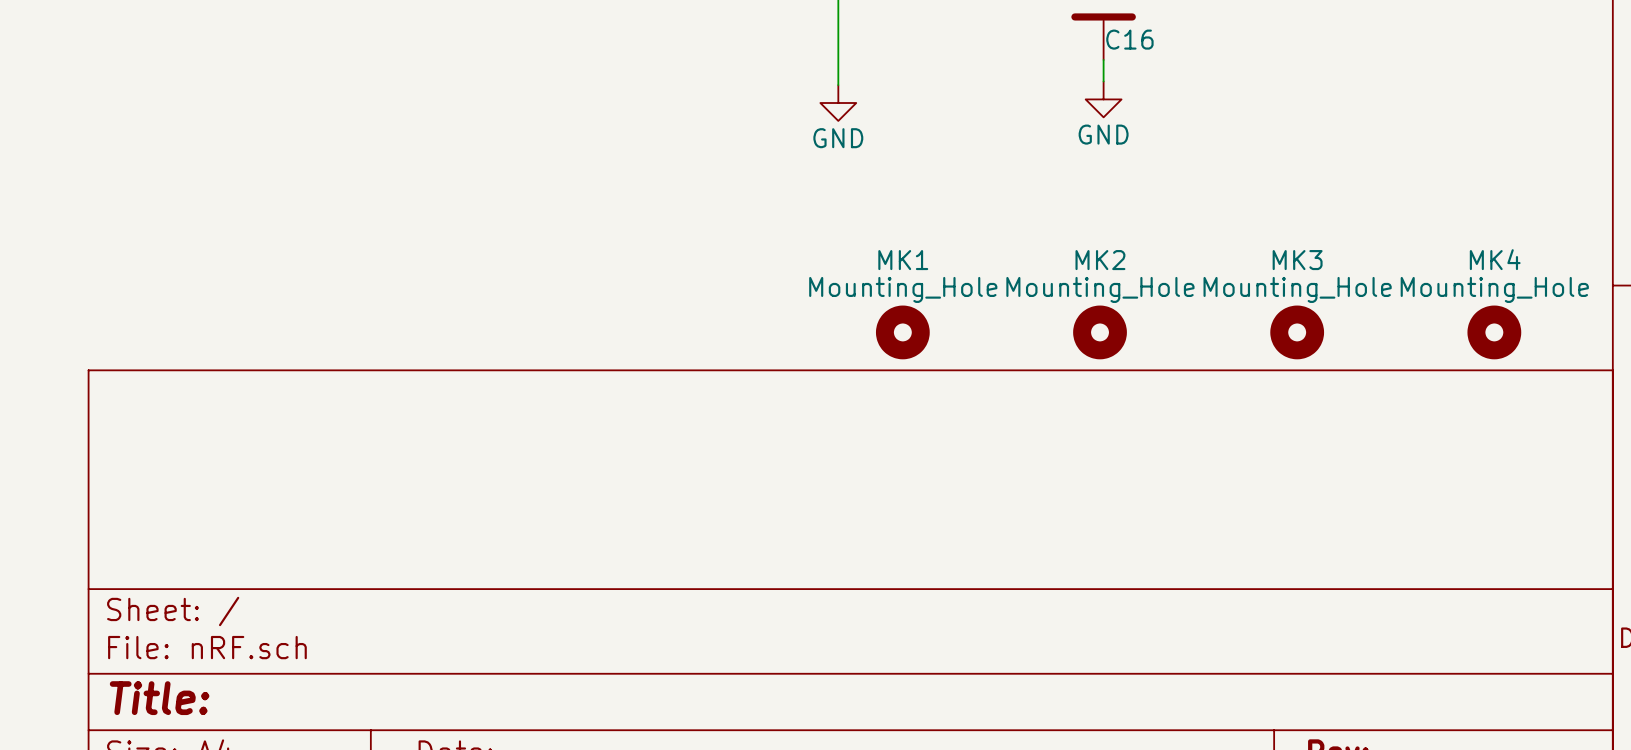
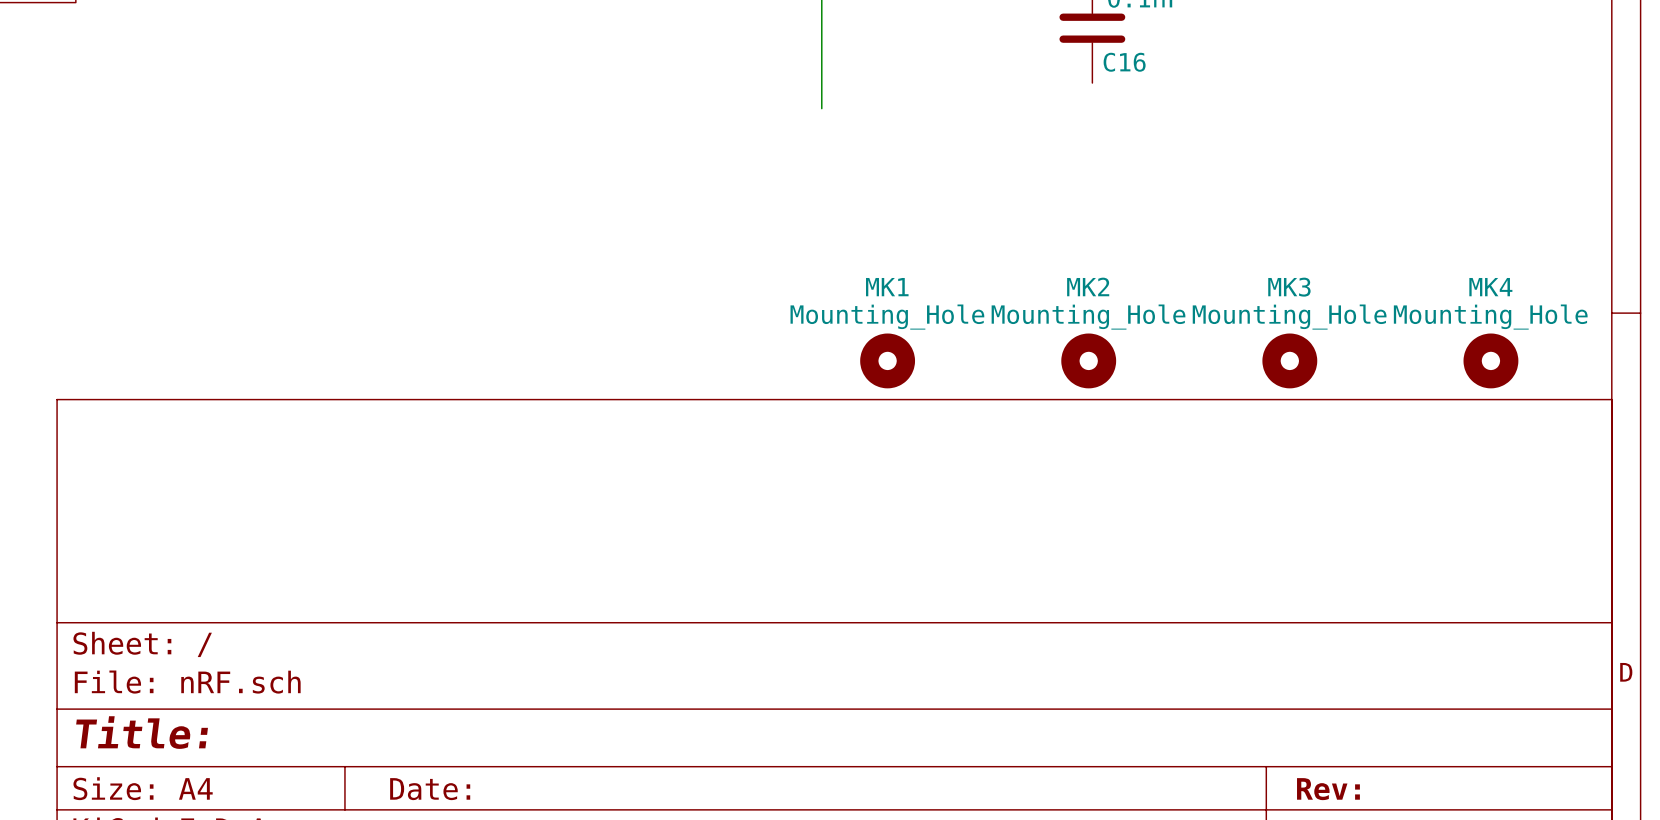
wire: (1103, 59) (1103, 81) -> none
power symbol: GND (1103, 99) -> none
power symbol: GND (838, 103) -> none

